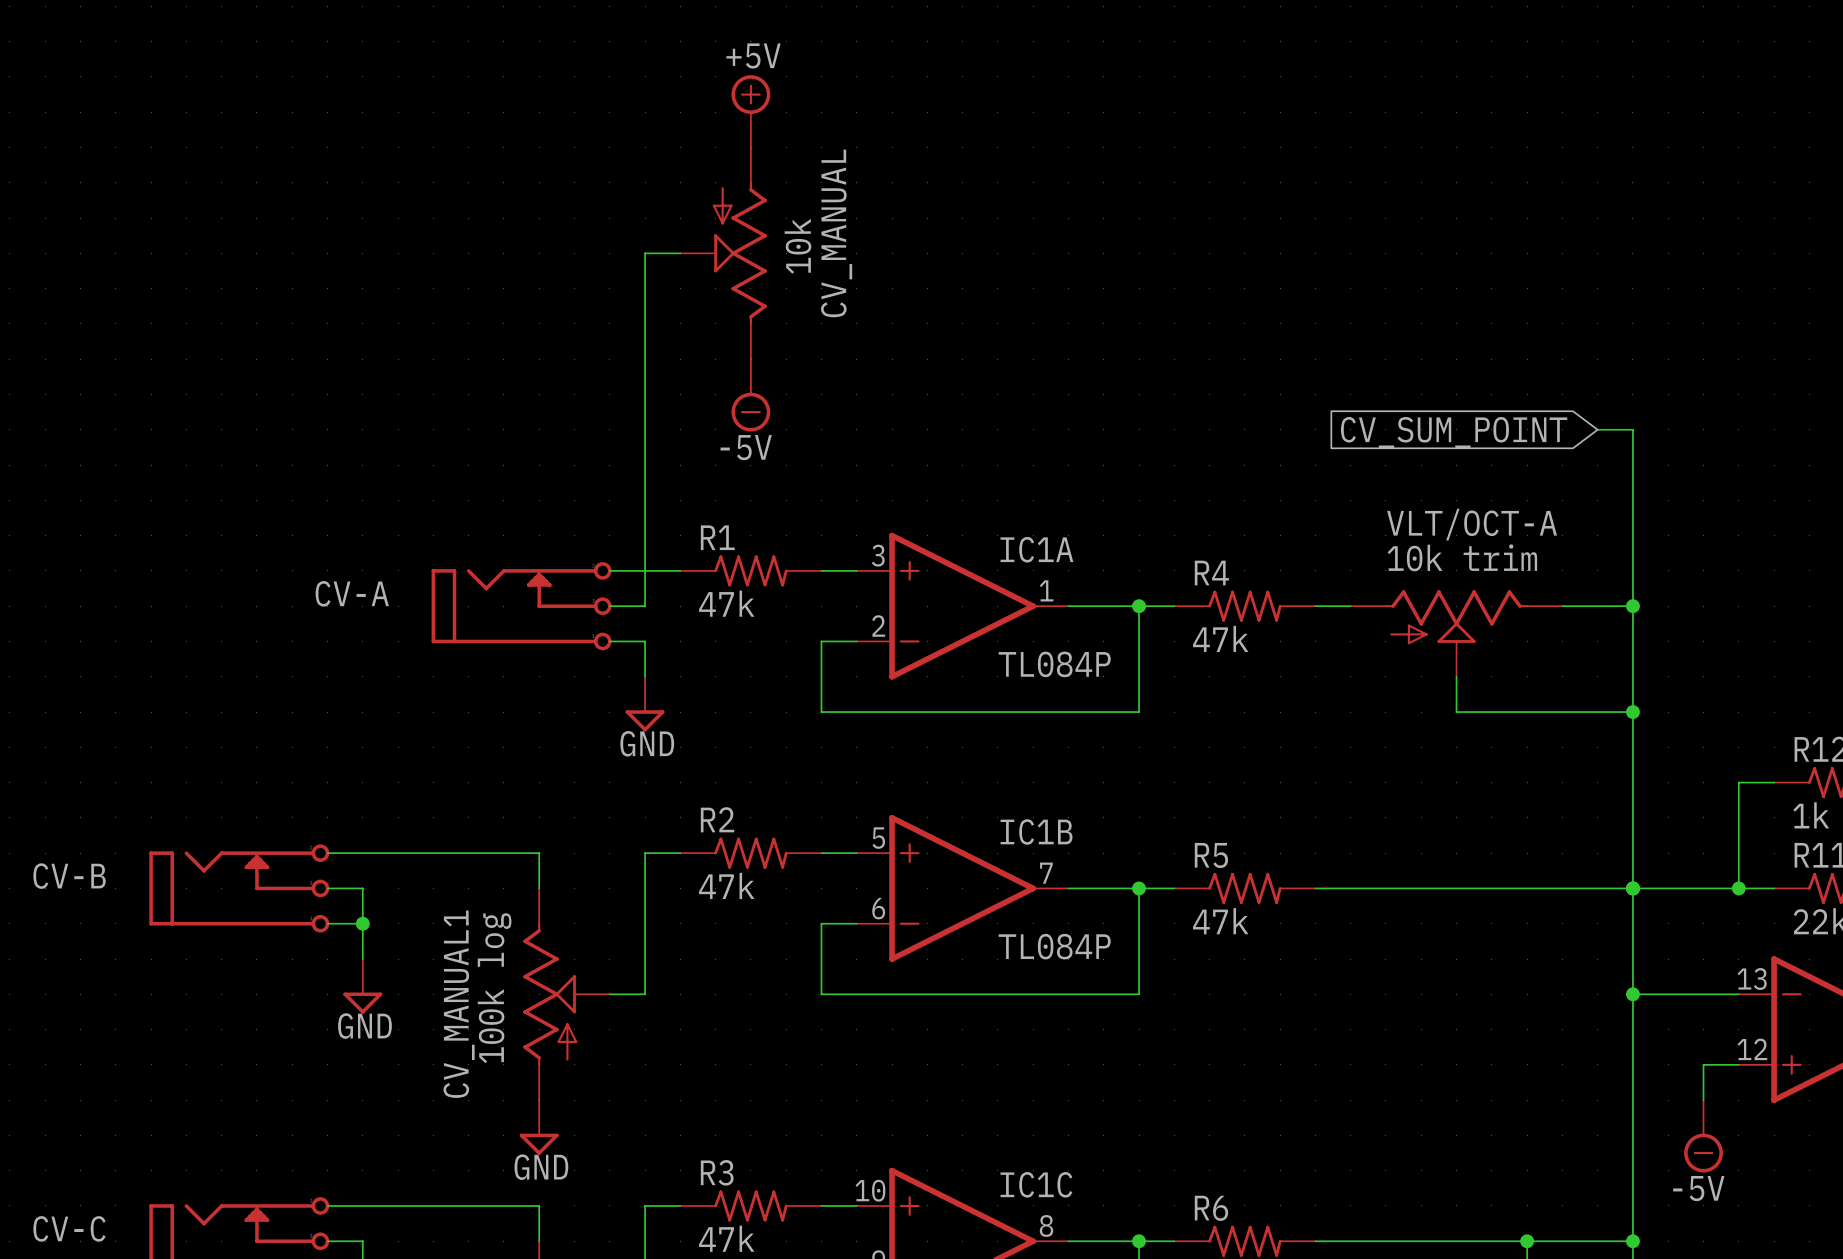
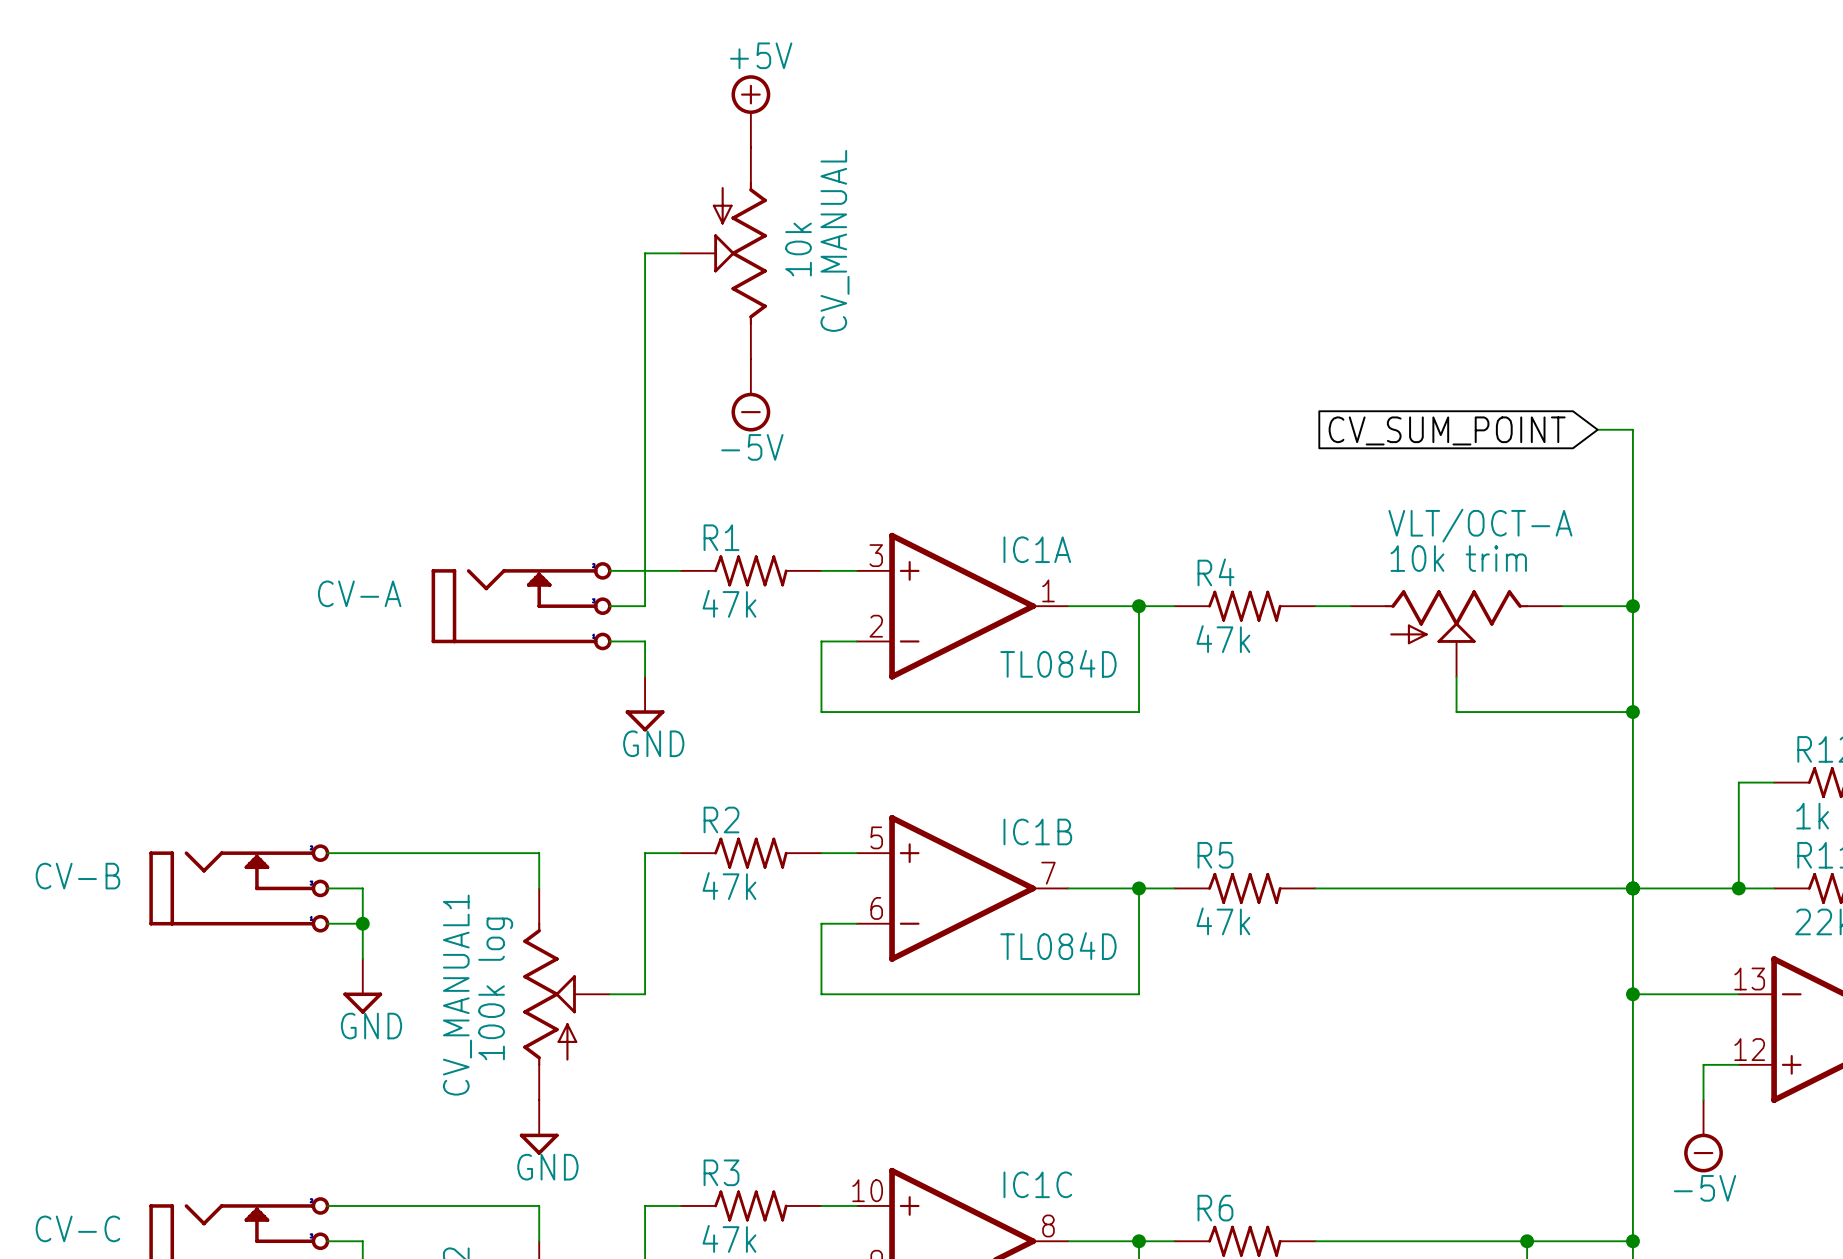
IC1A value: TL084P (1054, 664) -> TL084D (1058, 663)
IC1B value: TL084P (1054, 946) -> TL084D (1058, 946)

